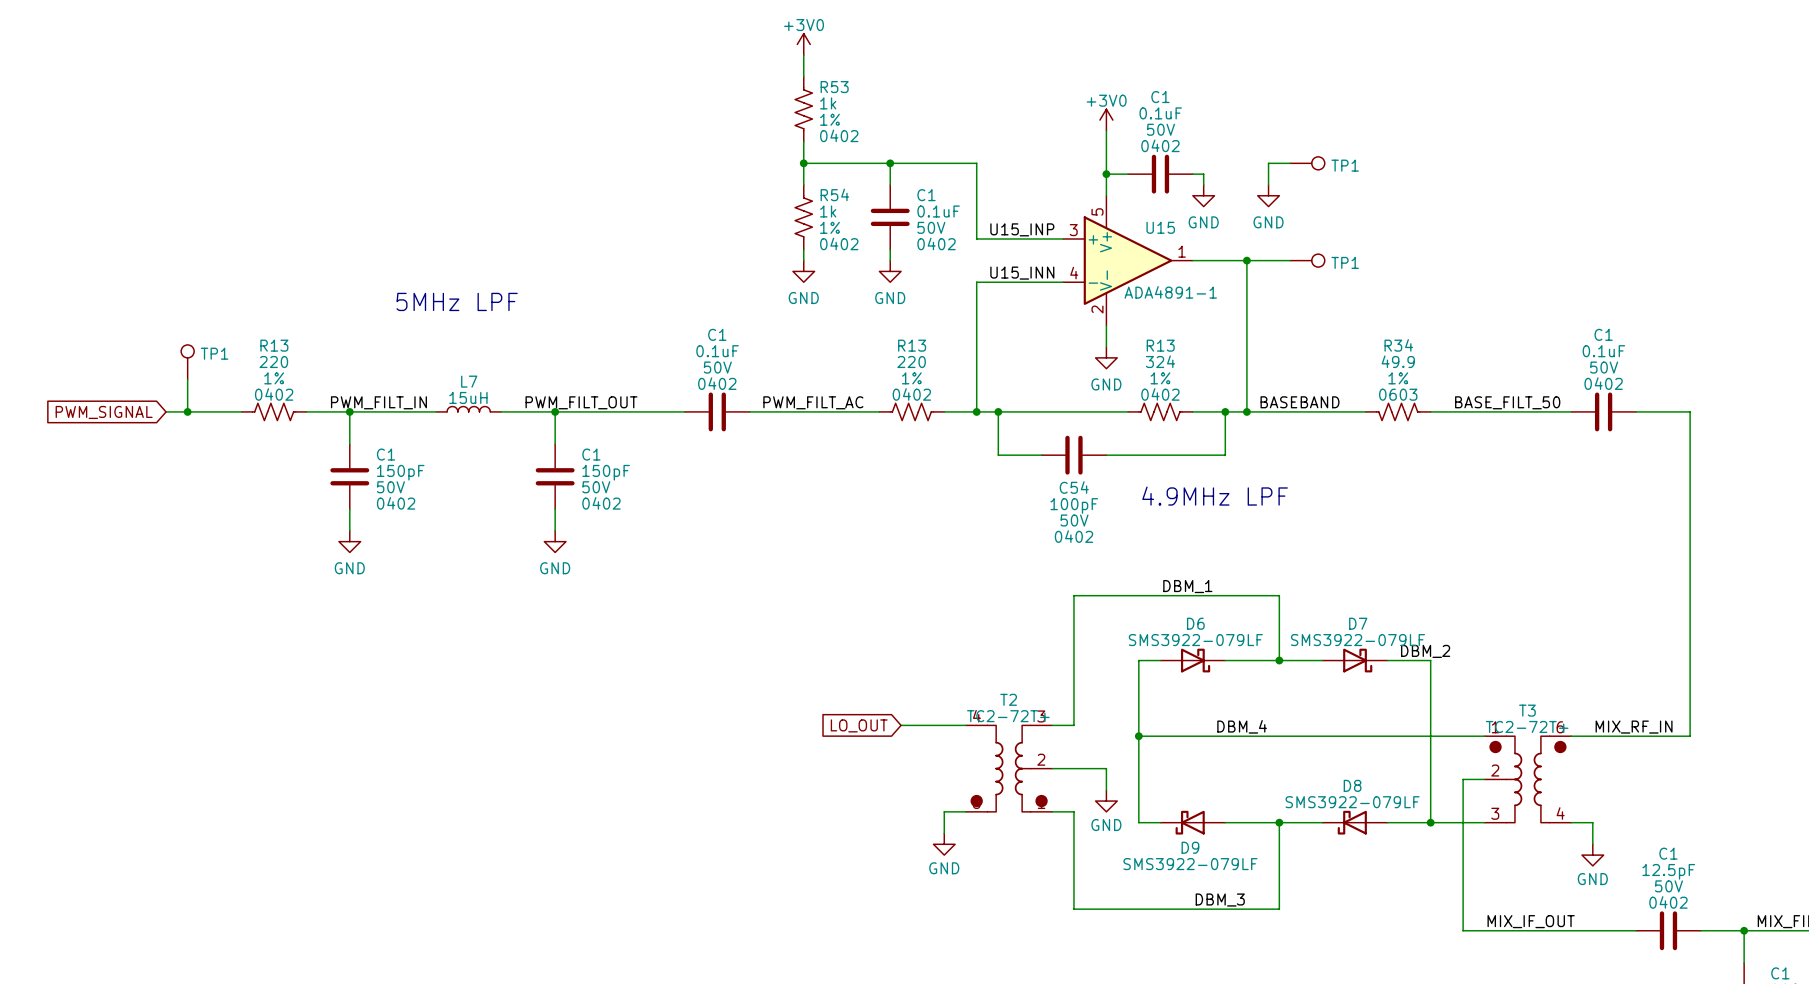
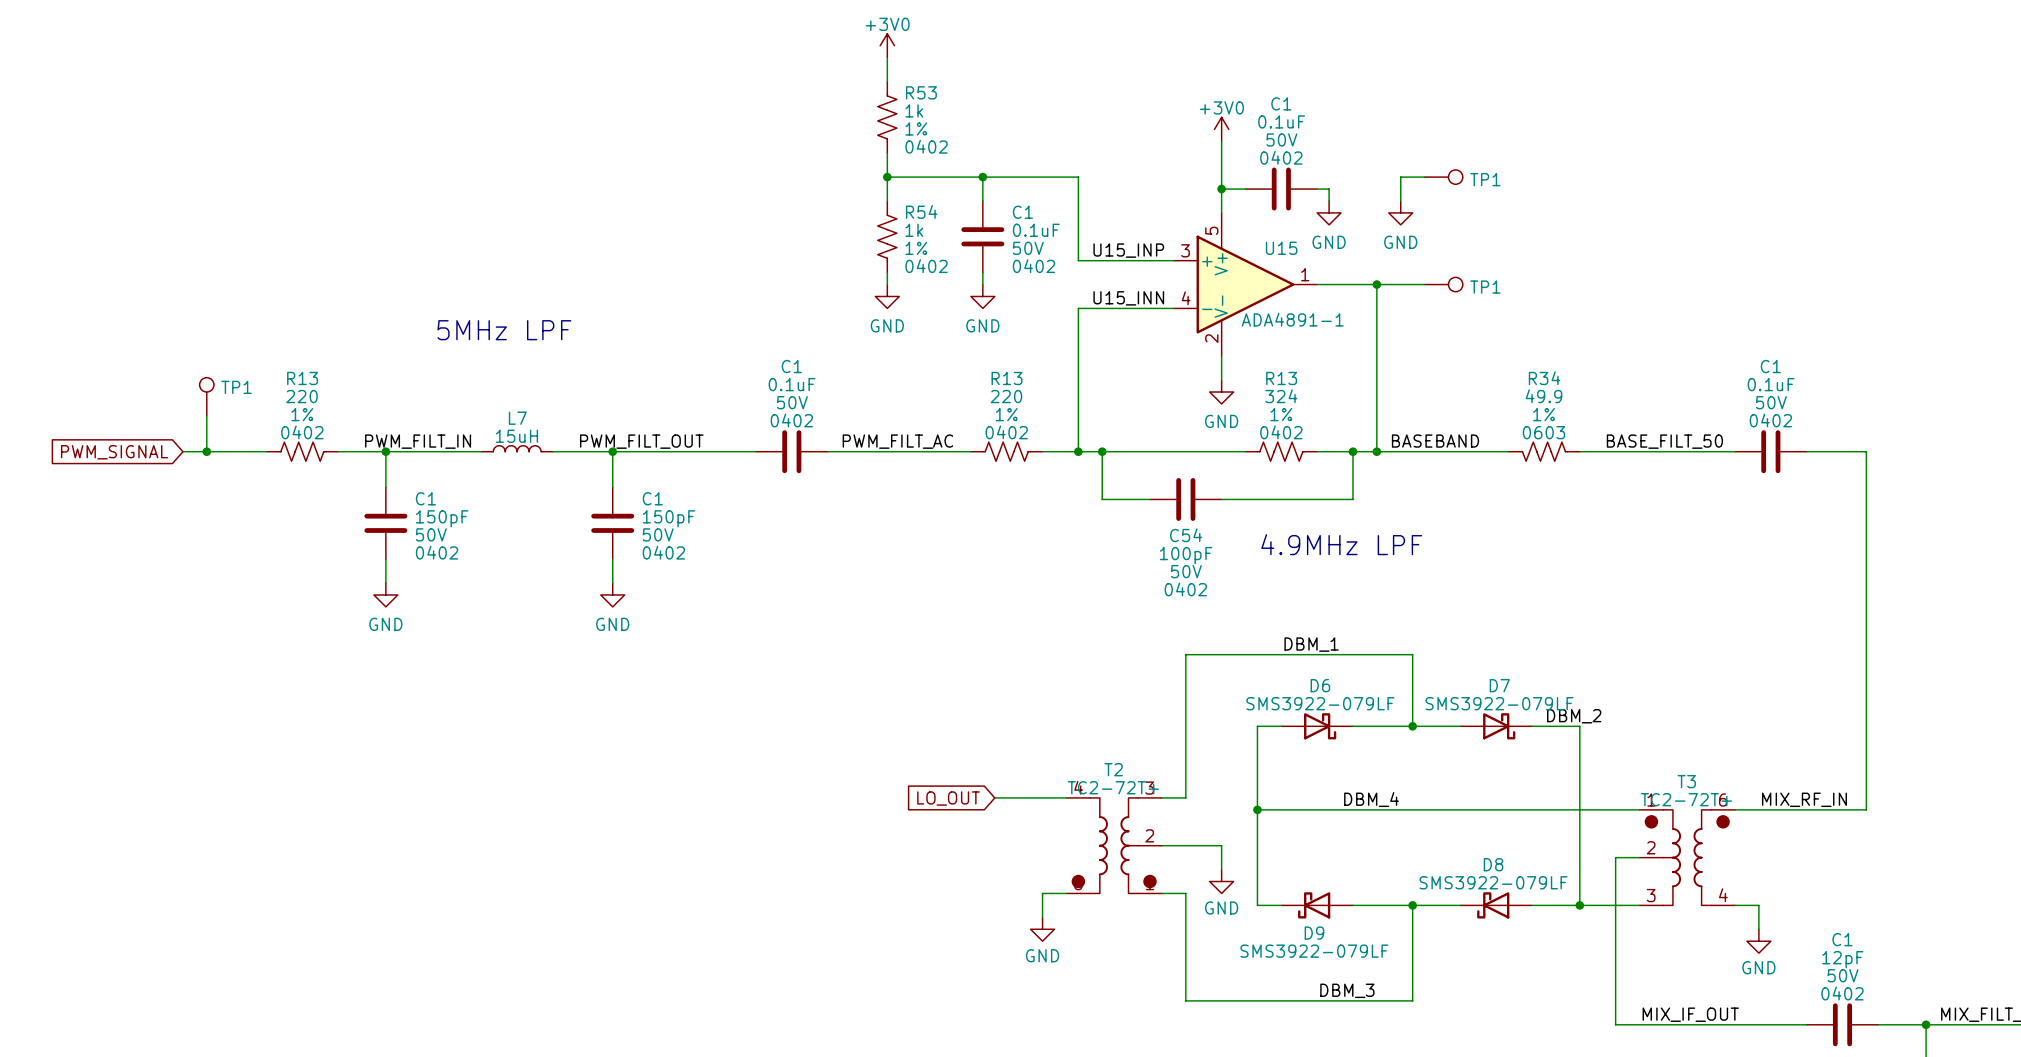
C1 value: 12.5pF (1668, 871) -> 12pF (1842, 959)

